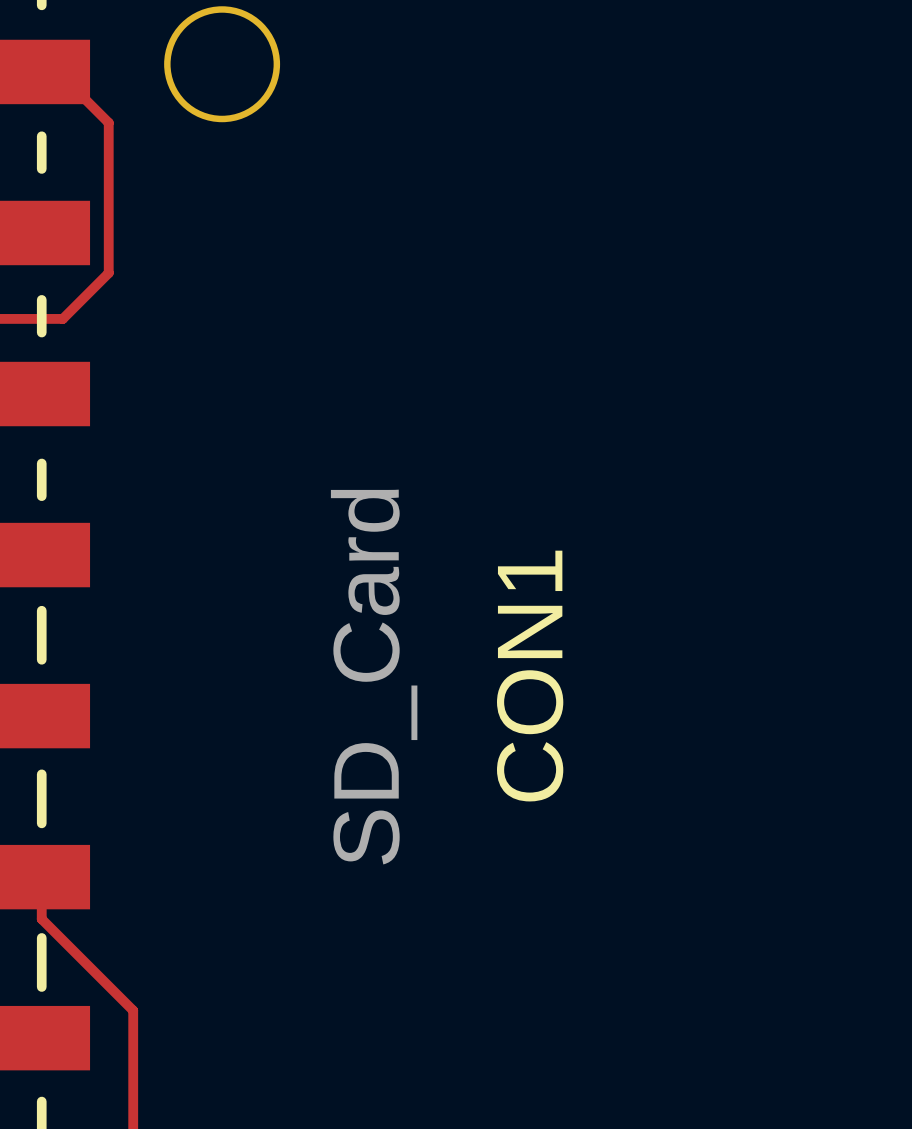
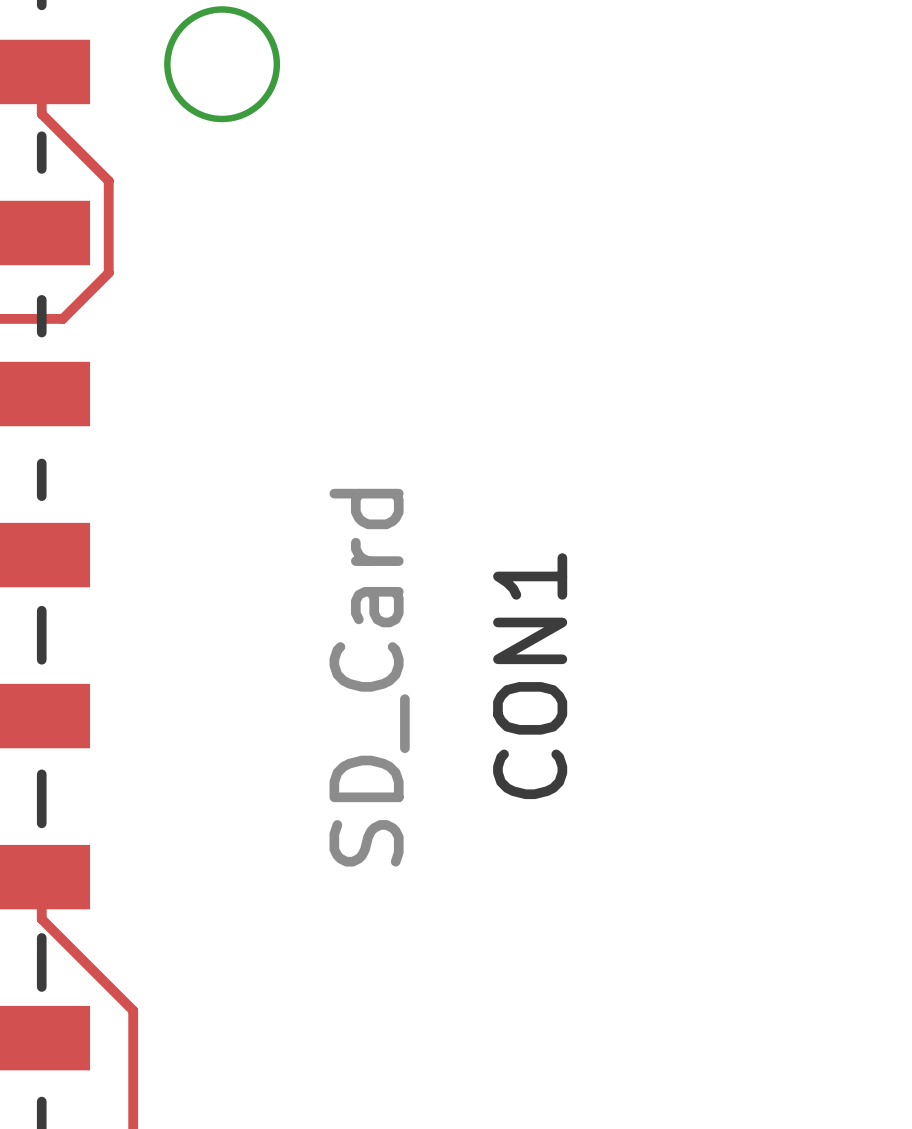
top track: (41, 71) (57, 71) (108, 122) (108, 180) -> (41, 71) (41, 113) (108, 180)

